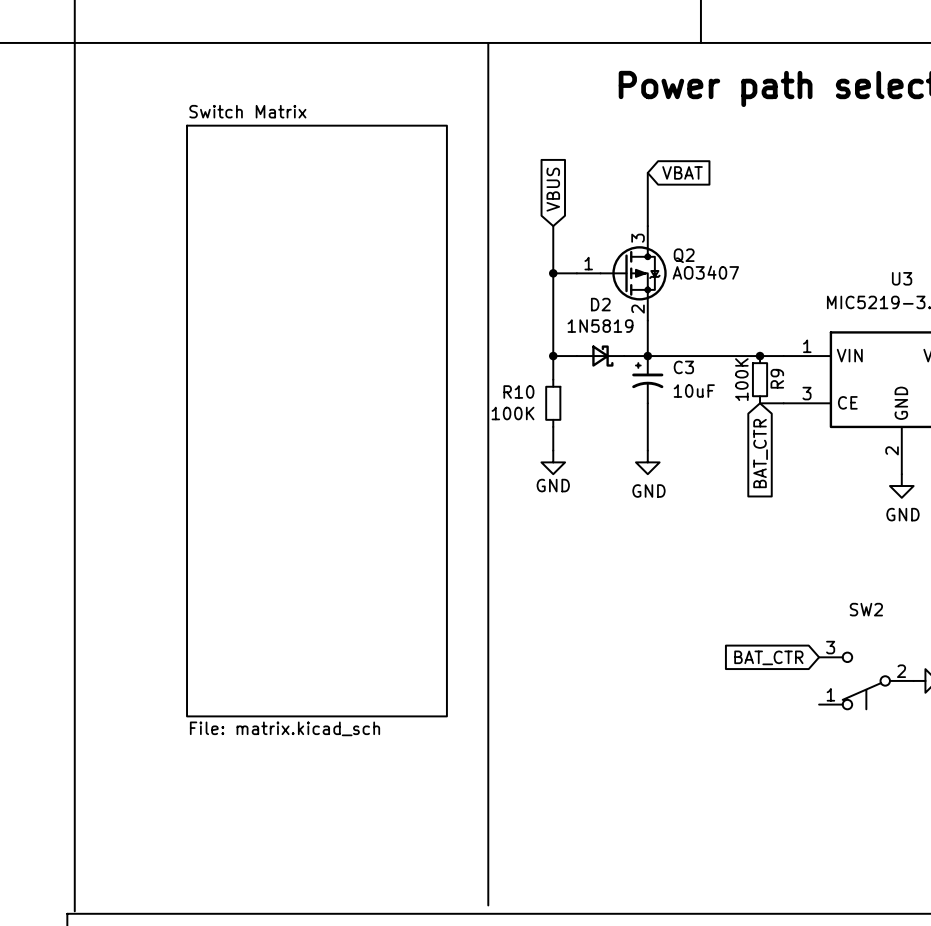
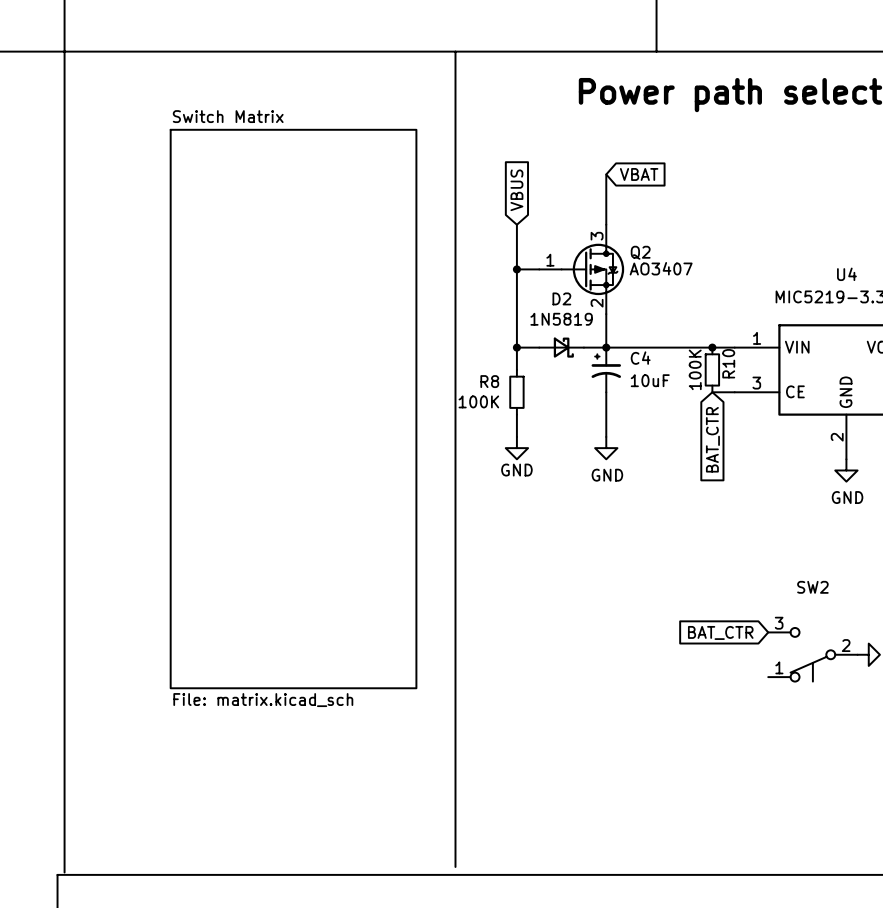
U3 name: U3 (902, 278) -> U4 (846, 274)
C3 name: C3 (683, 367) -> C4 (640, 358)
R9 name: R9 (777, 378) -> R10 (728, 363)
R10 name: R10 (518, 392) -> R8 (489, 381)

